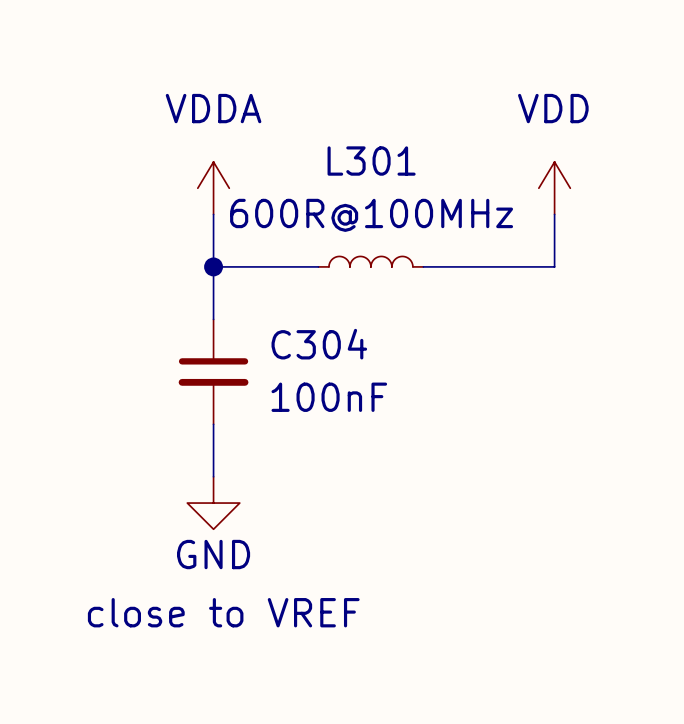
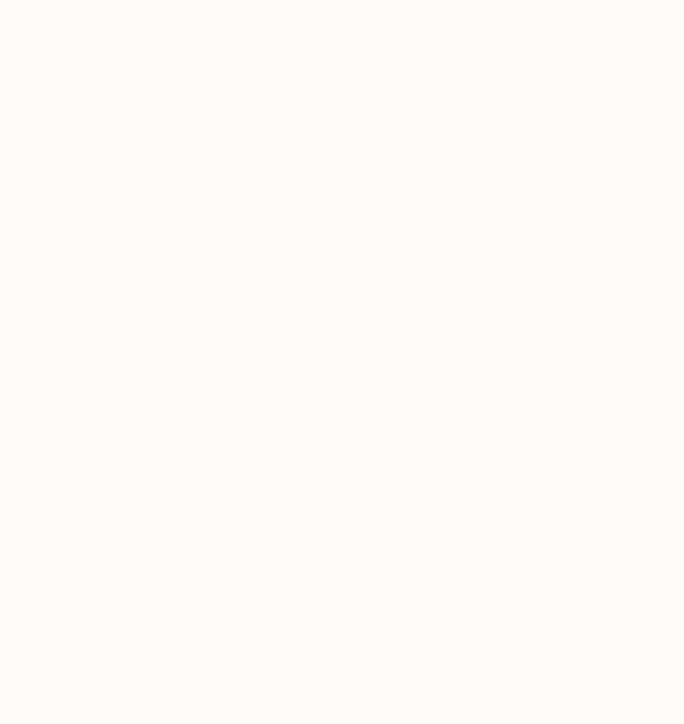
power symbol: VDDA (213, 188) -> none
power symbol: VDD (554, 188) -> none
wire: (213, 214) (213, 319) -> none
wire: (554, 214) (554, 266) (423, 266) -> none
L301: 600R@100MHz (370, 261) -> none
wire: (213, 266) (318, 266) -> none
junction: (213, 266) -> none
C304: 100nF (213, 371) -> none
wire: (213, 424) (213, 476) -> none
power symbol: GND (213, 503) -> none
text: close to VREF (223, 612) -> none

